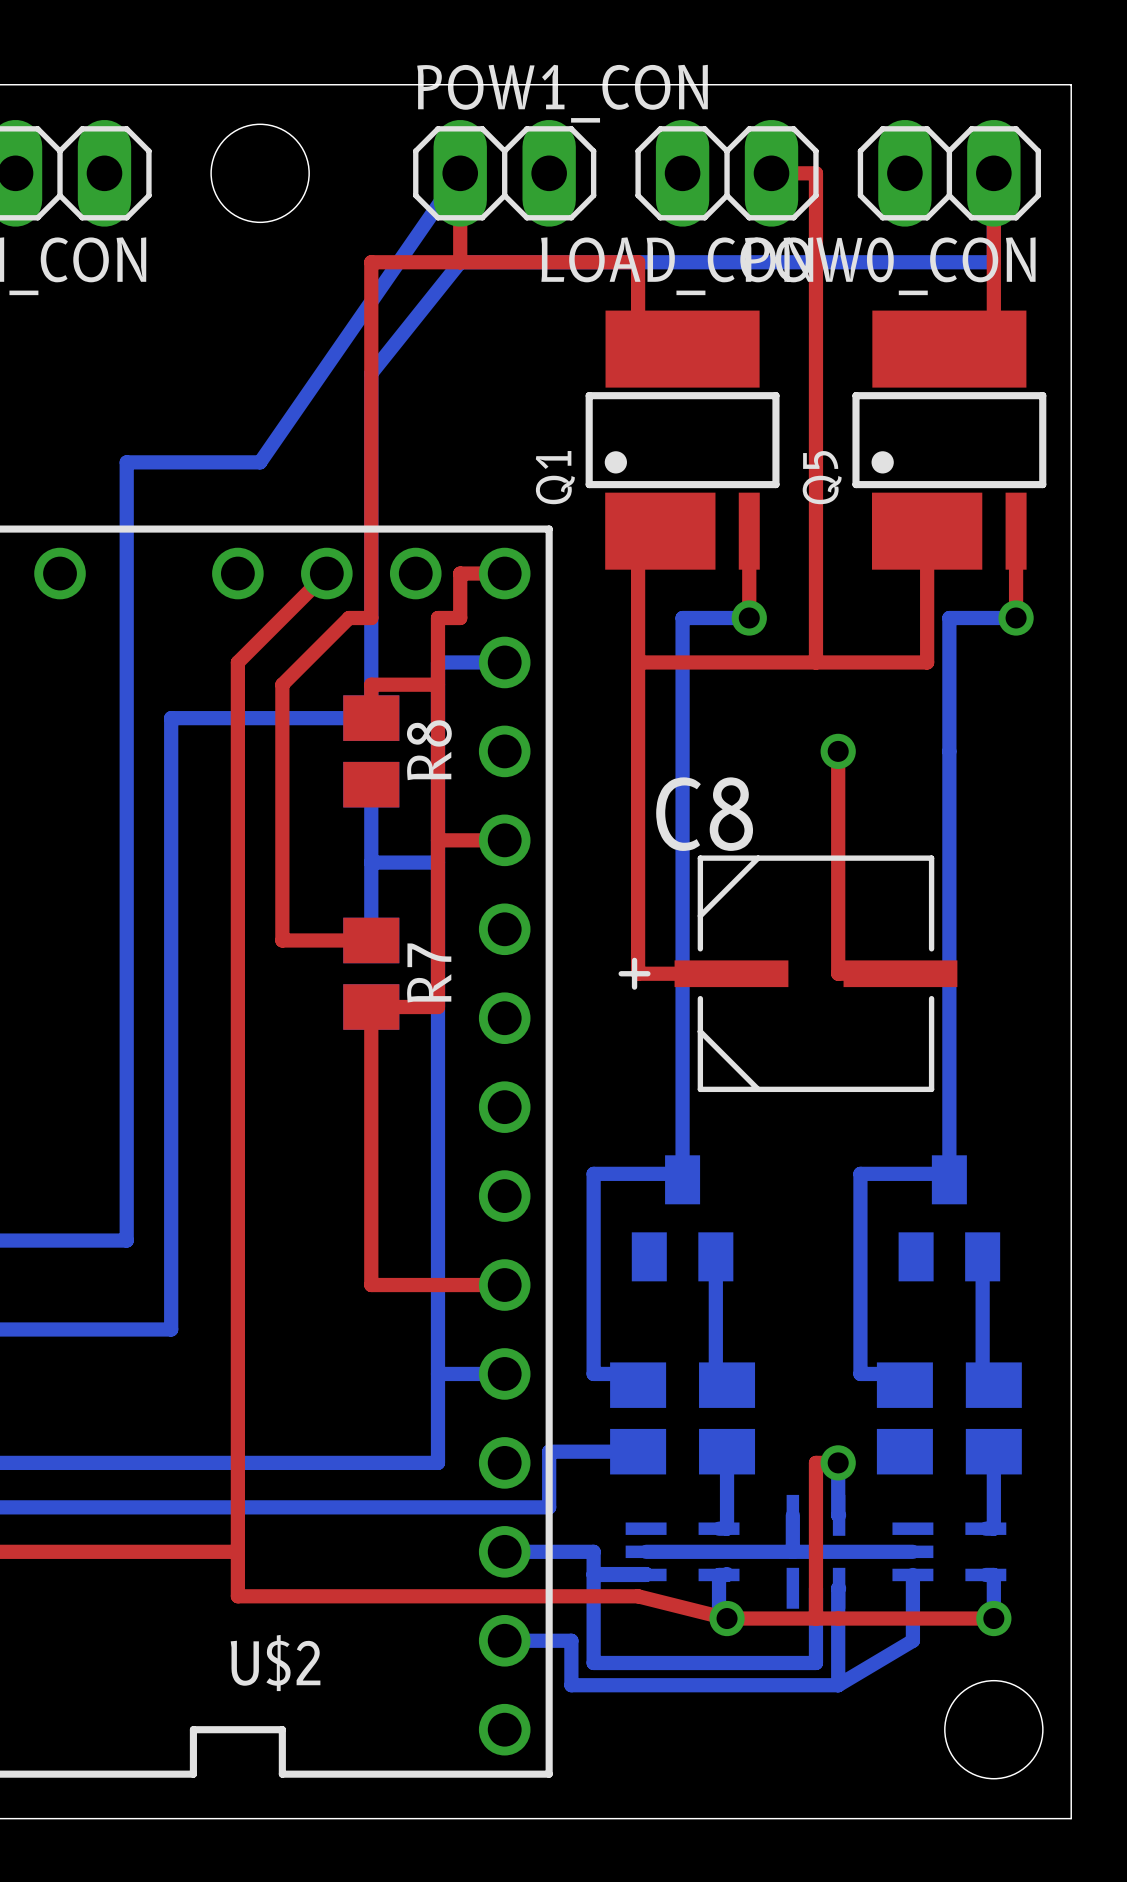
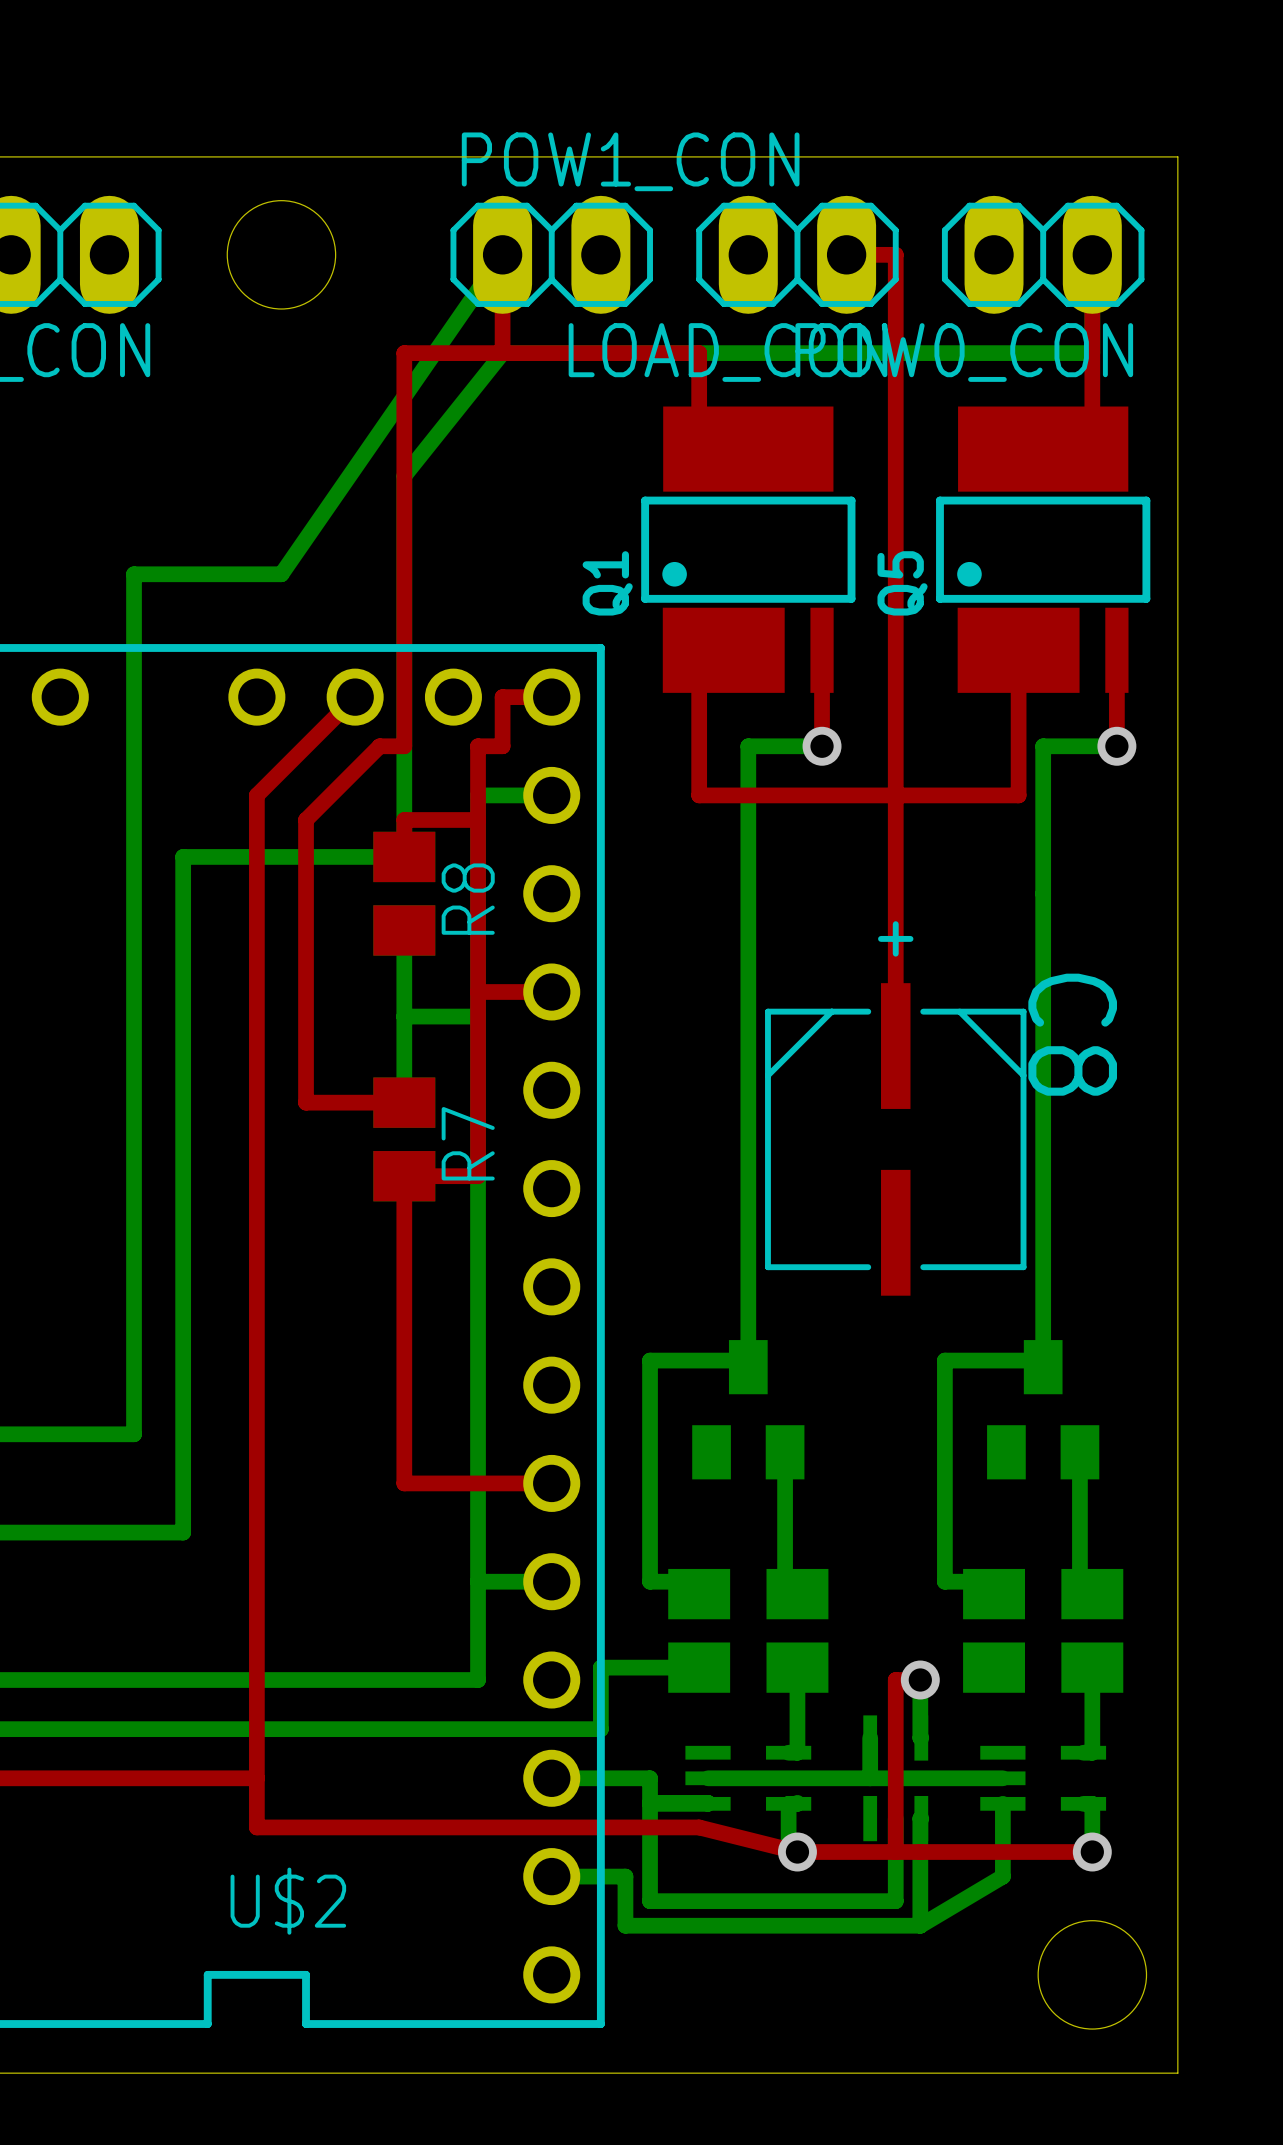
top track: (638, 662) (638, 973) (731, 973) -> none
top track: none -> (895, 795) (895, 1046)
top track: (838, 751) (838, 973) (900, 973) -> none
via: (838, 751) -> none
C8 rotation: 0° (787, 973) -> 90° clockwise (895, 1108)

